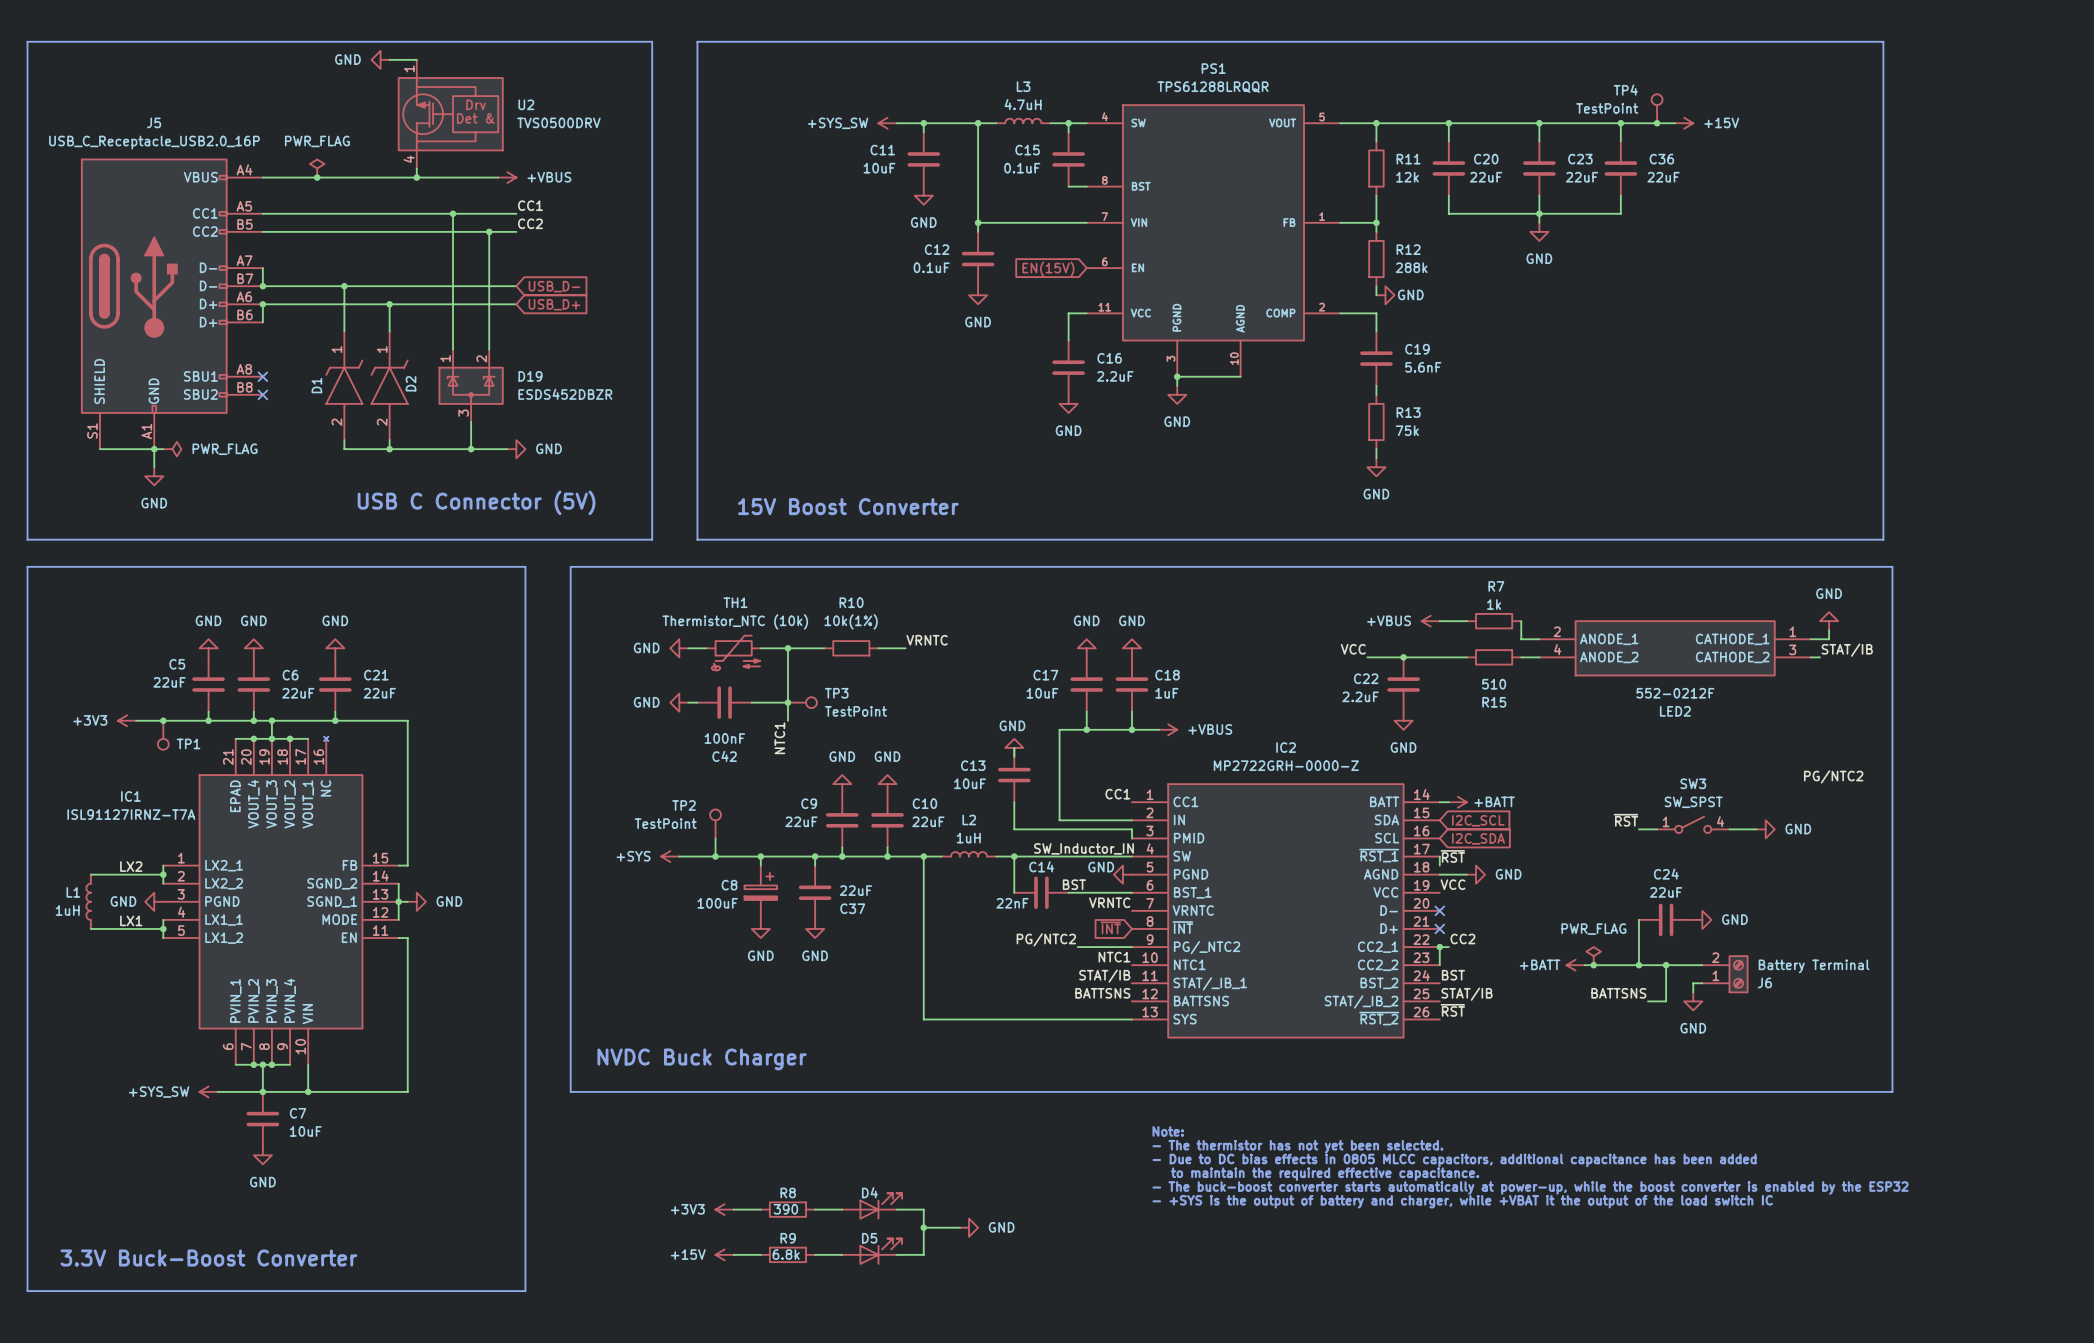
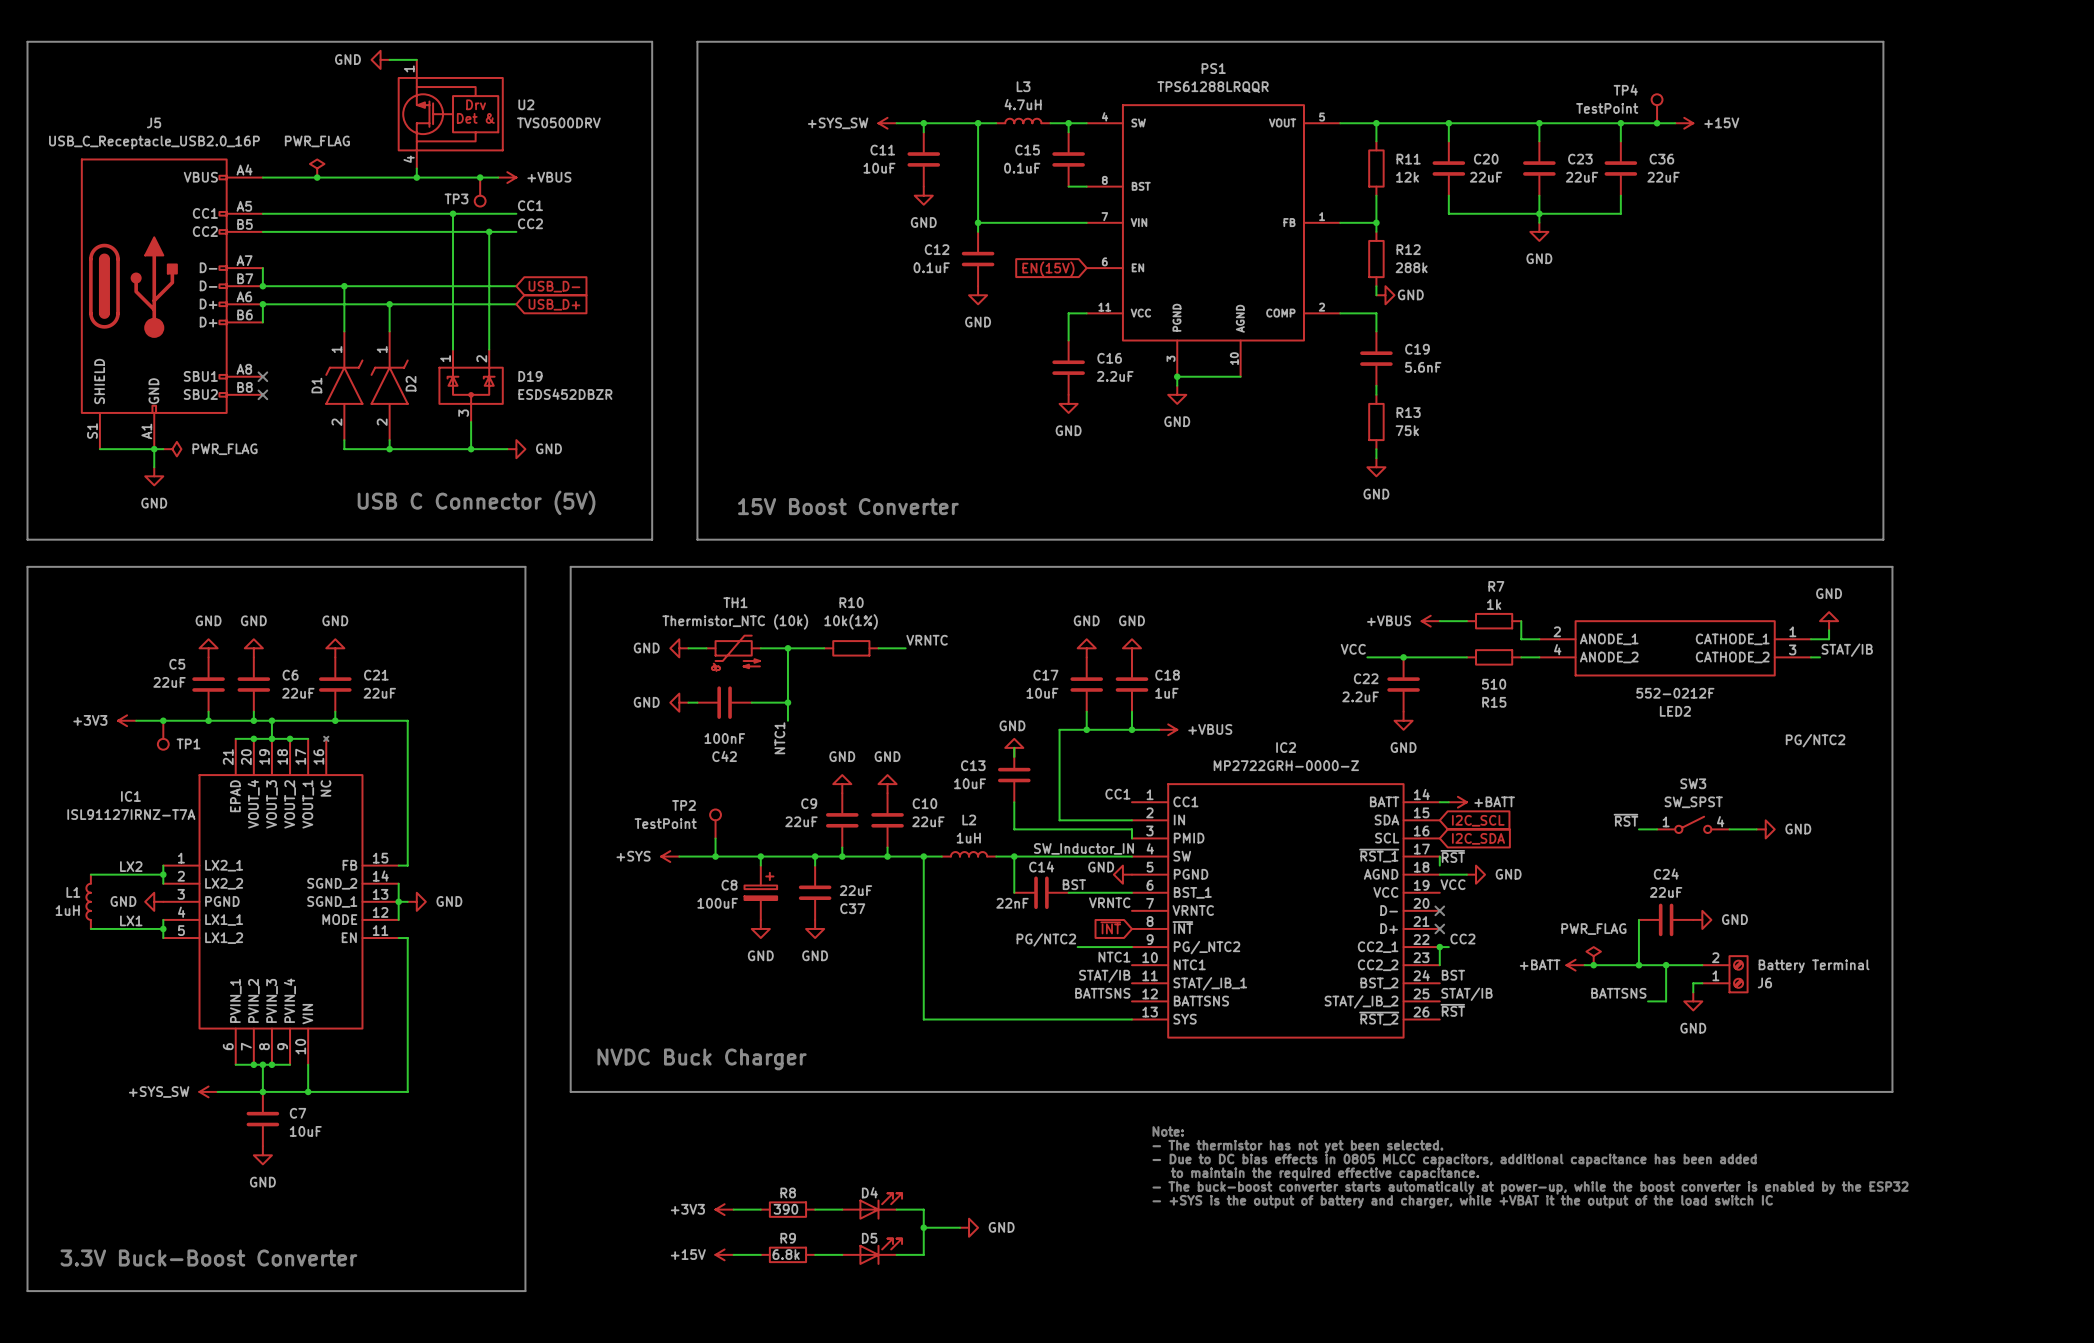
junction: none -> (480, 177)
TP3 name position: TP3 (836, 693) -> TP3 (456, 198)
TP3 position: (802, 702) -> (480, 192)
TP3 rotation: 0° (811, 702) -> 90° clockwise (480, 201)
TP3 value: TestPoint (855, 711) -> none
label position: PG/NTC2 (1833, 776) -> PG/NTC2 (1815, 740)

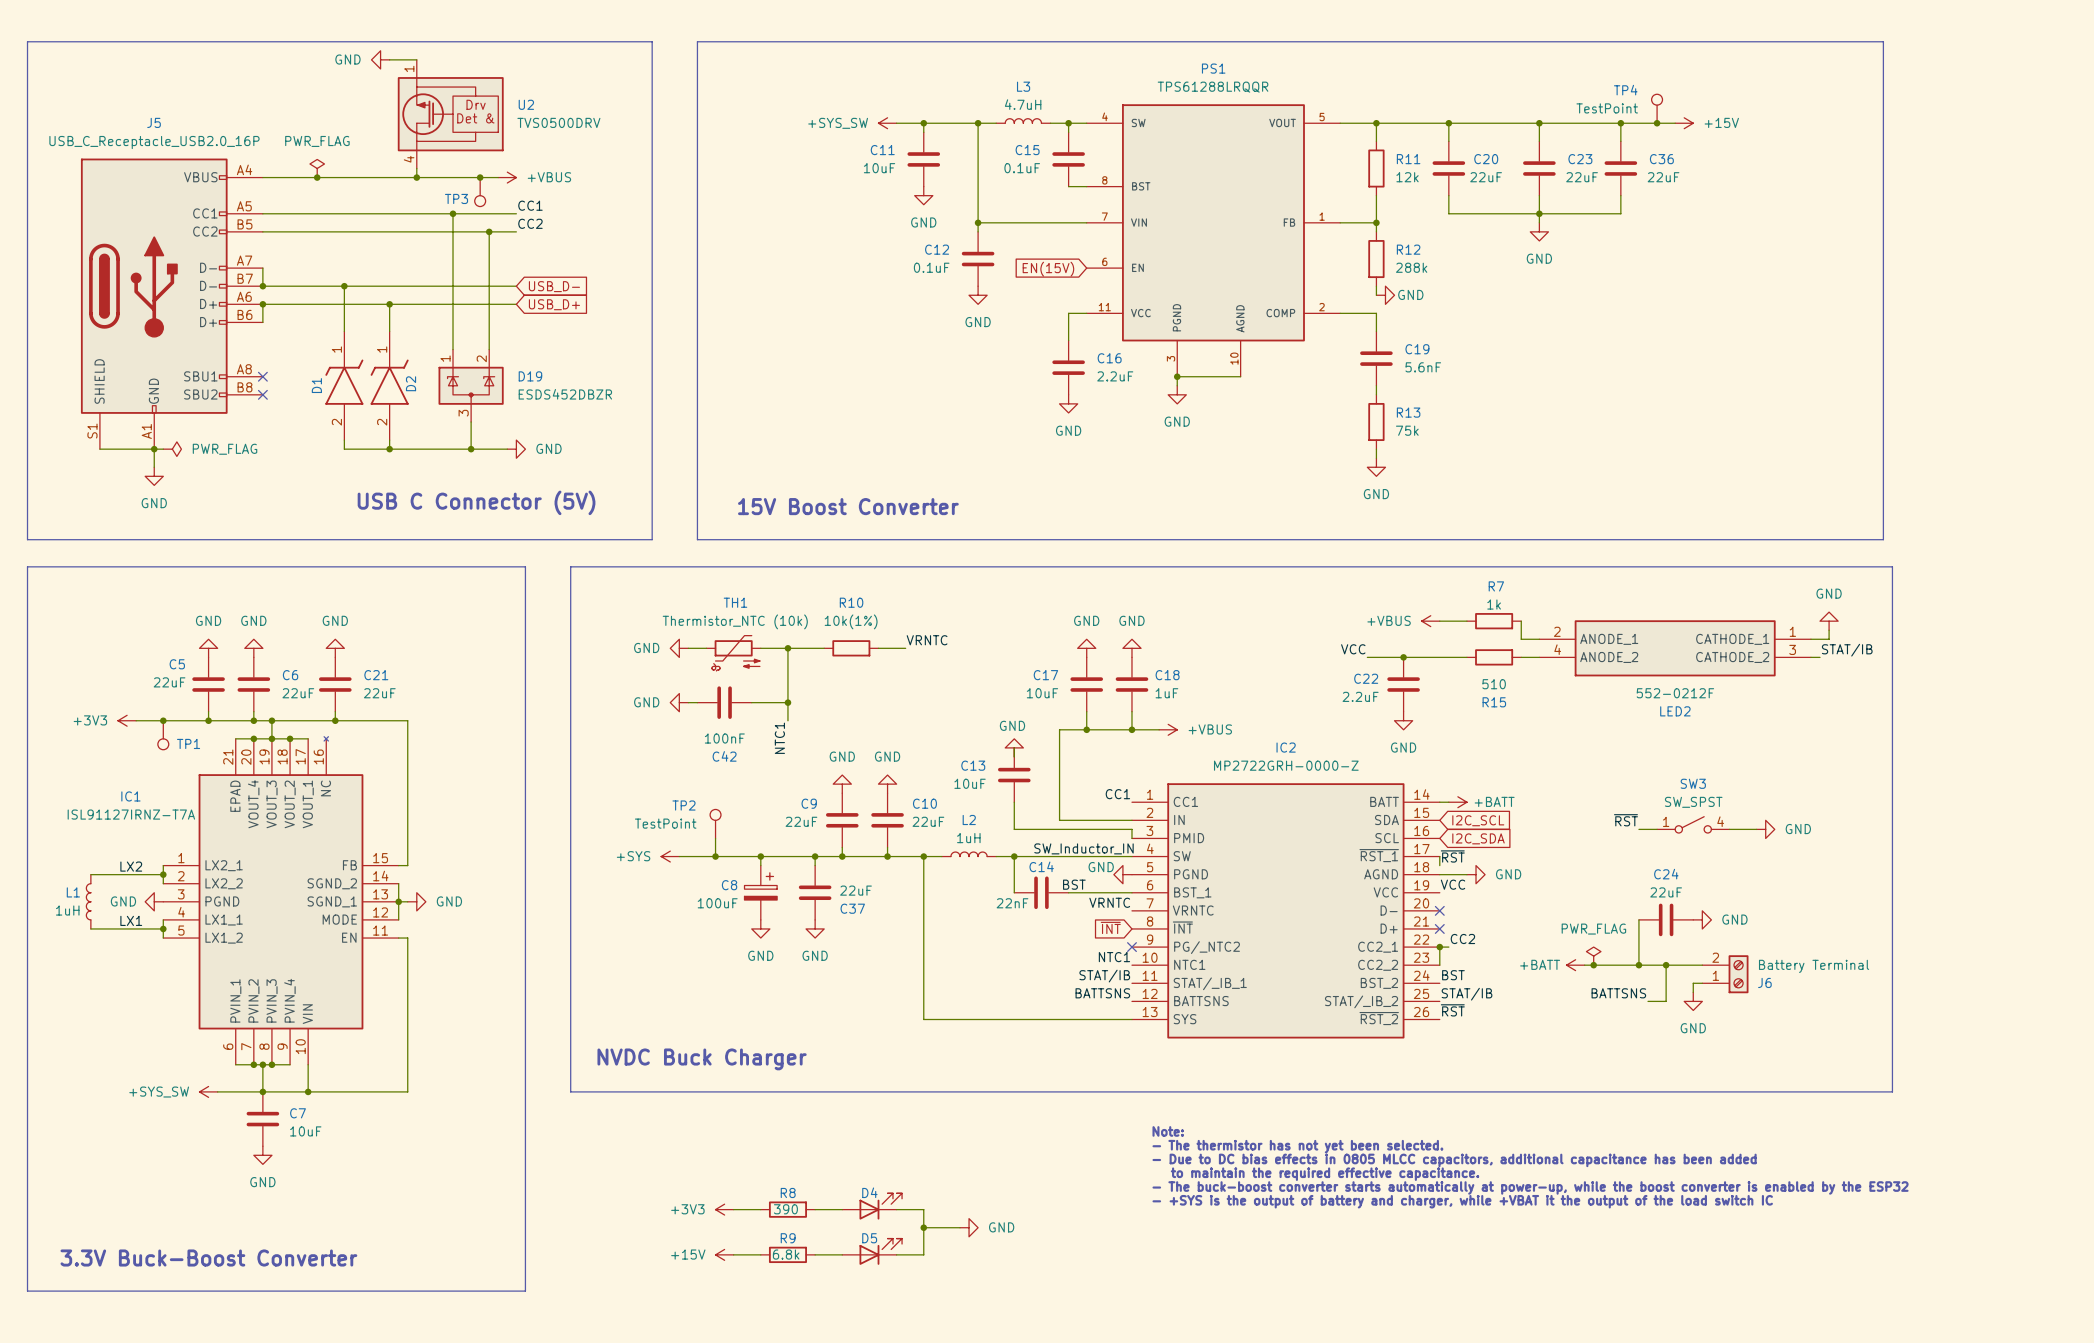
label: PG/NTC2 (1815, 740) -> none
label: PG/NTC2 (1046, 939) -> none
wire: (1077, 947) (1131, 947) -> none
no-connect mark: none -> (1131, 947)

